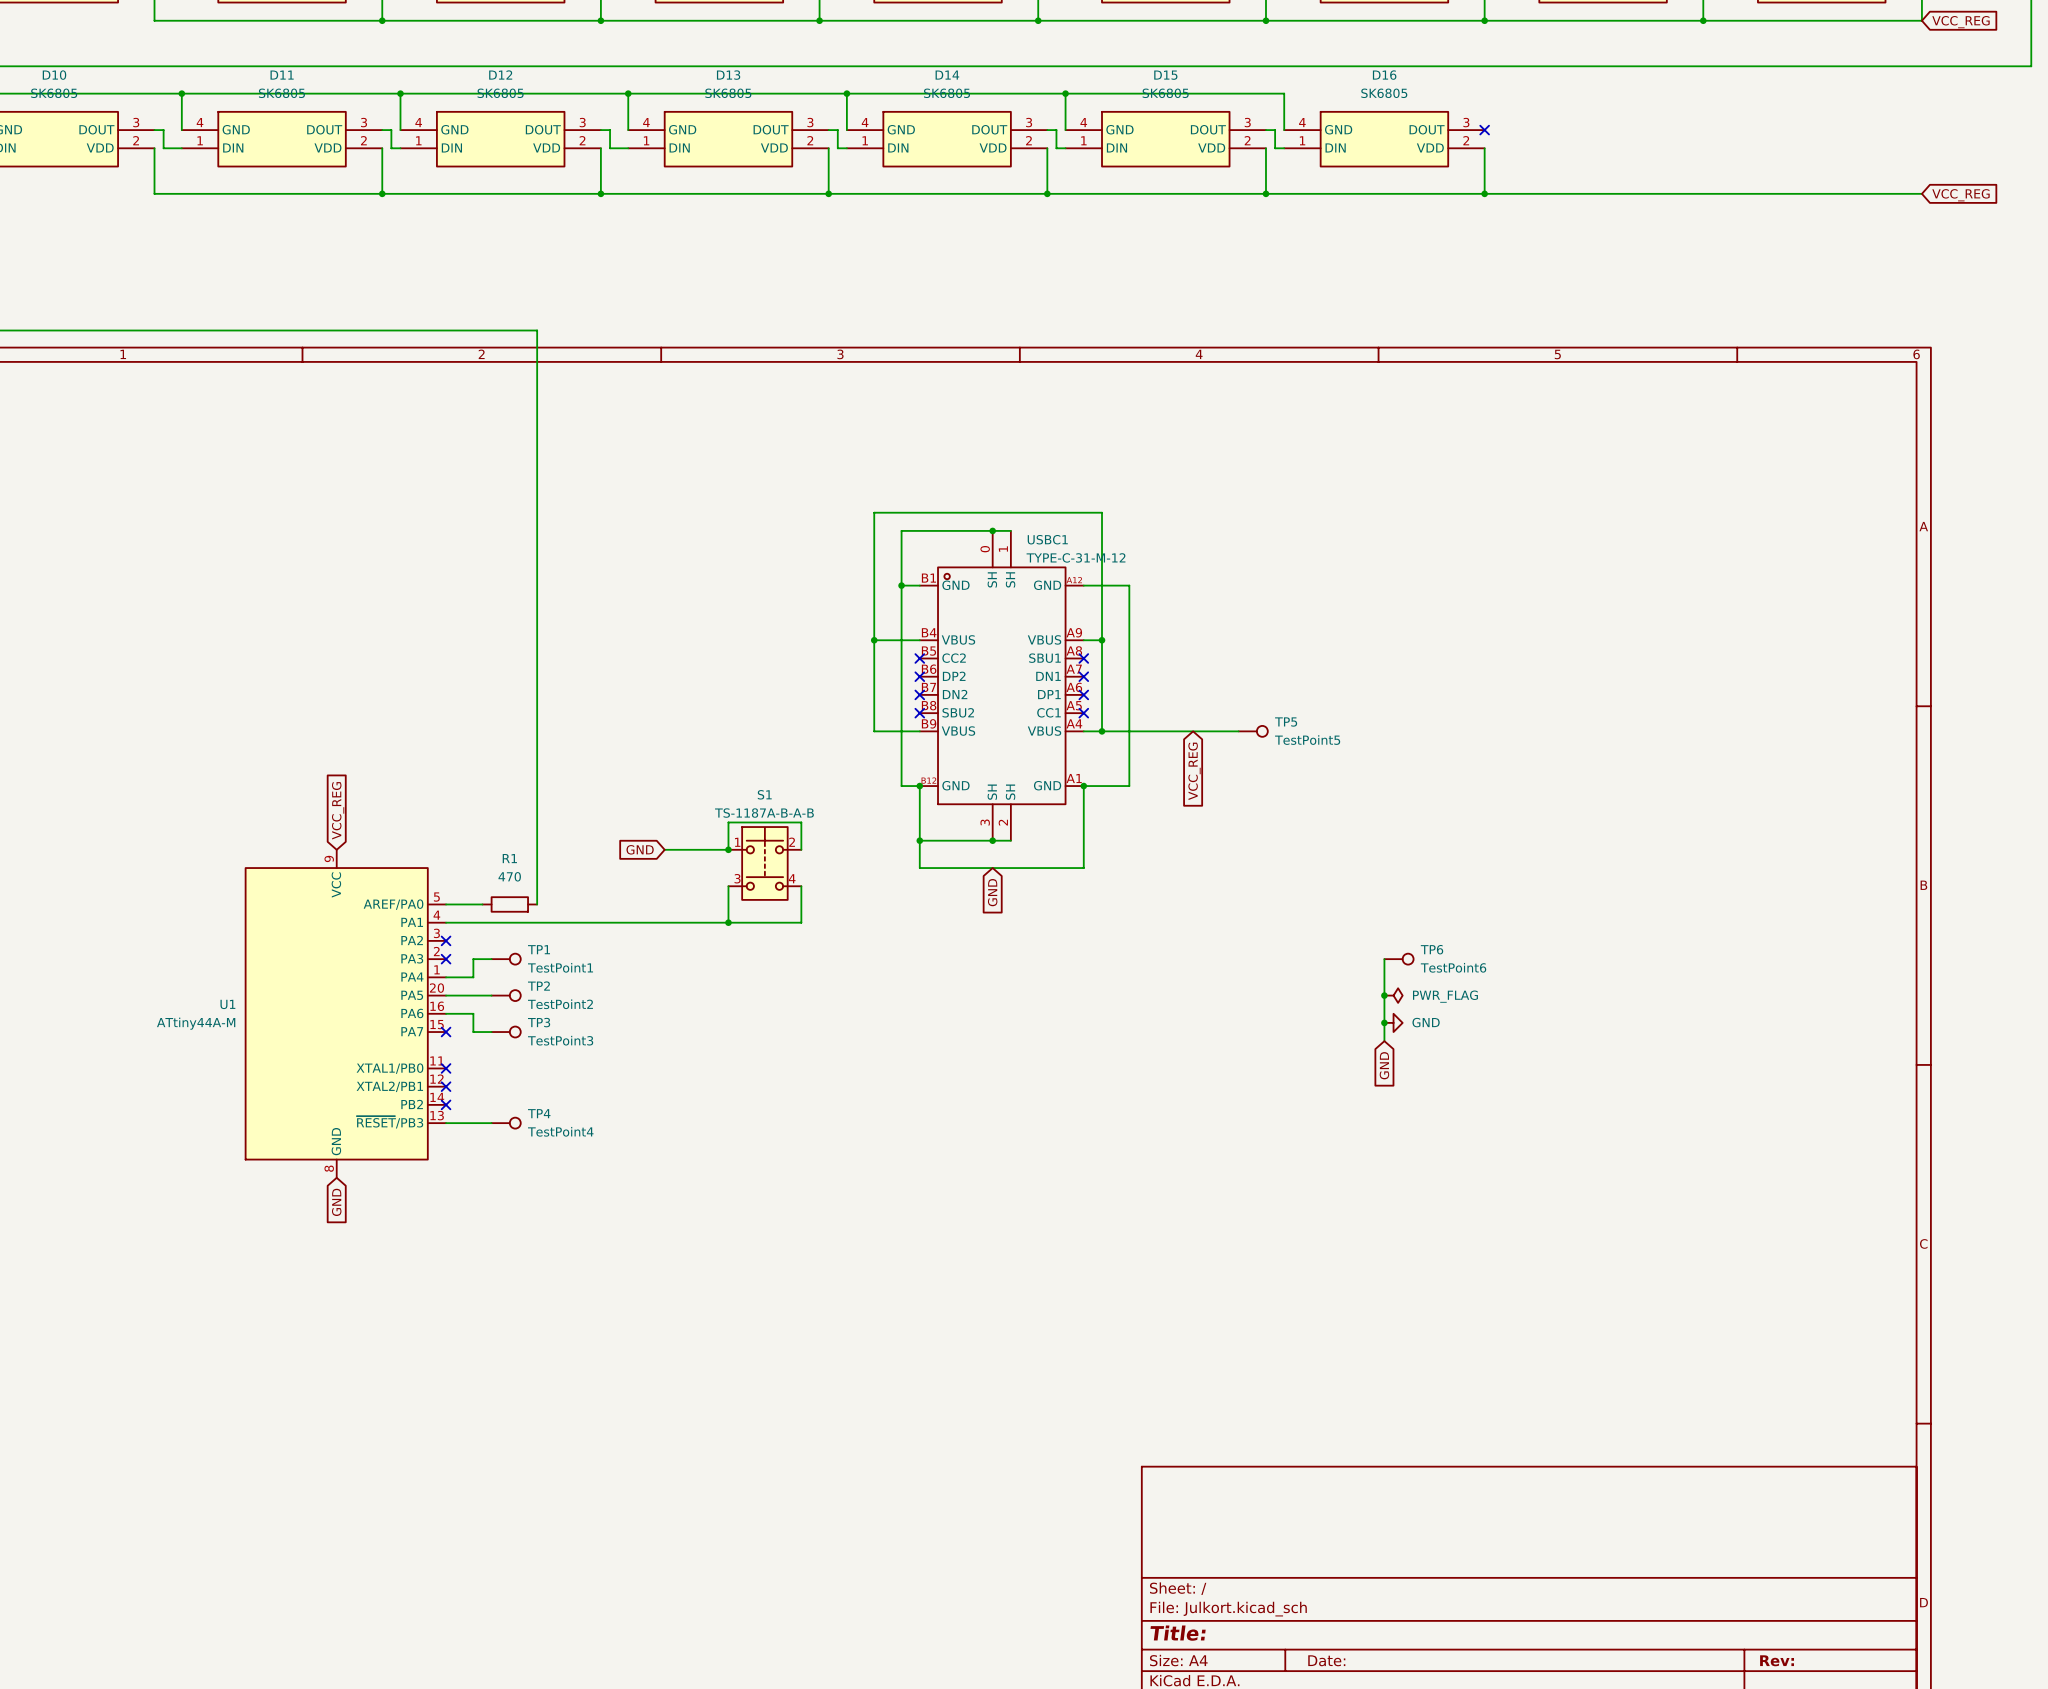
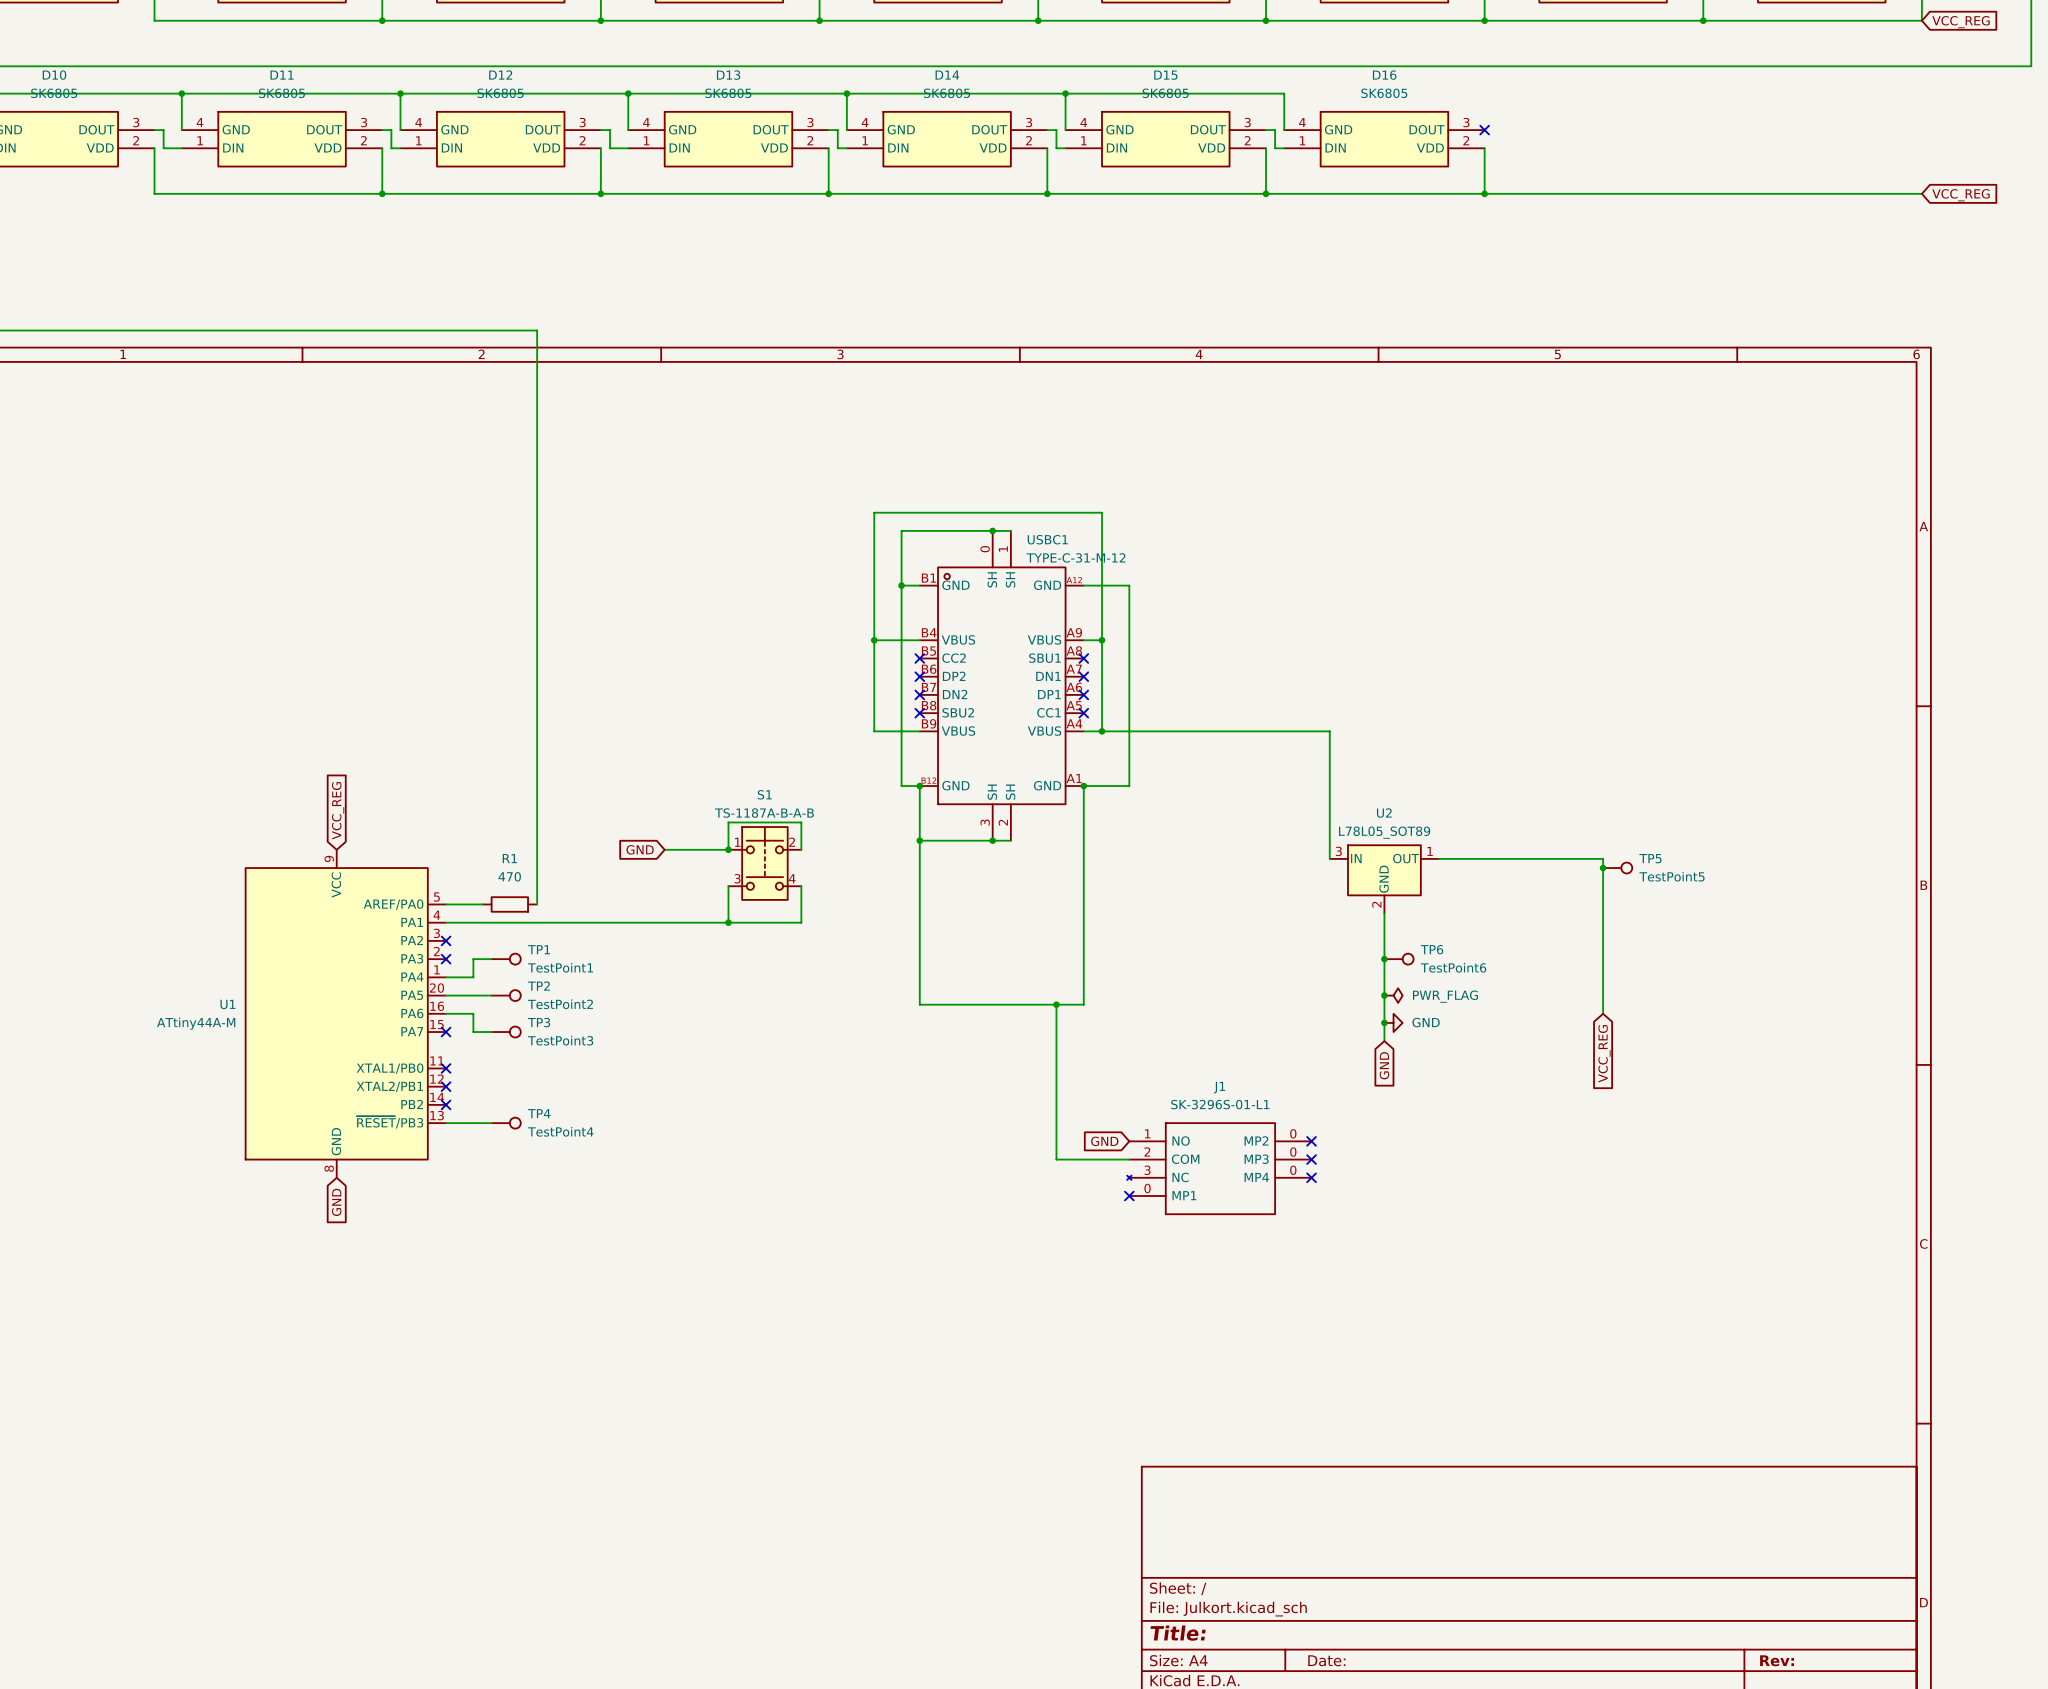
wire: none -> (1238, 731) (1329, 731) (1329, 858)
TP5 position: (1253, 731) -> (1617, 868)
global label: VCC_REG (1194, 771) -> none
wire: none -> (1439, 858) (1603, 858) (1603, 1013)
wire: (919, 868) (1083, 868) -> (919, 868) (919, 1004) (1083, 1004) (1083, 868)
junction: none -> (1603, 868)
U2: none -> L78L05_SOT89 (1384, 878)
global label: GND (992, 892) -> none
wire: none -> (1384, 913) (1384, 959)
junction: none -> (1384, 959)
wire: none -> (1056, 1004) (1056, 1159) (1129, 1159)
junction: none -> (1056, 1004)
global label: none -> VCC_REG (1604, 1053)
global label: none -> GND (1104, 1141)
no-connect mark: none -> (1311, 1141)
no-connect mark: none -> (1311, 1159)
J1: none -> SK-3296S-01-L1 (1219, 1168)
no-connect mark: none -> (1311, 1177)
no-connect mark: none -> (1129, 1196)

